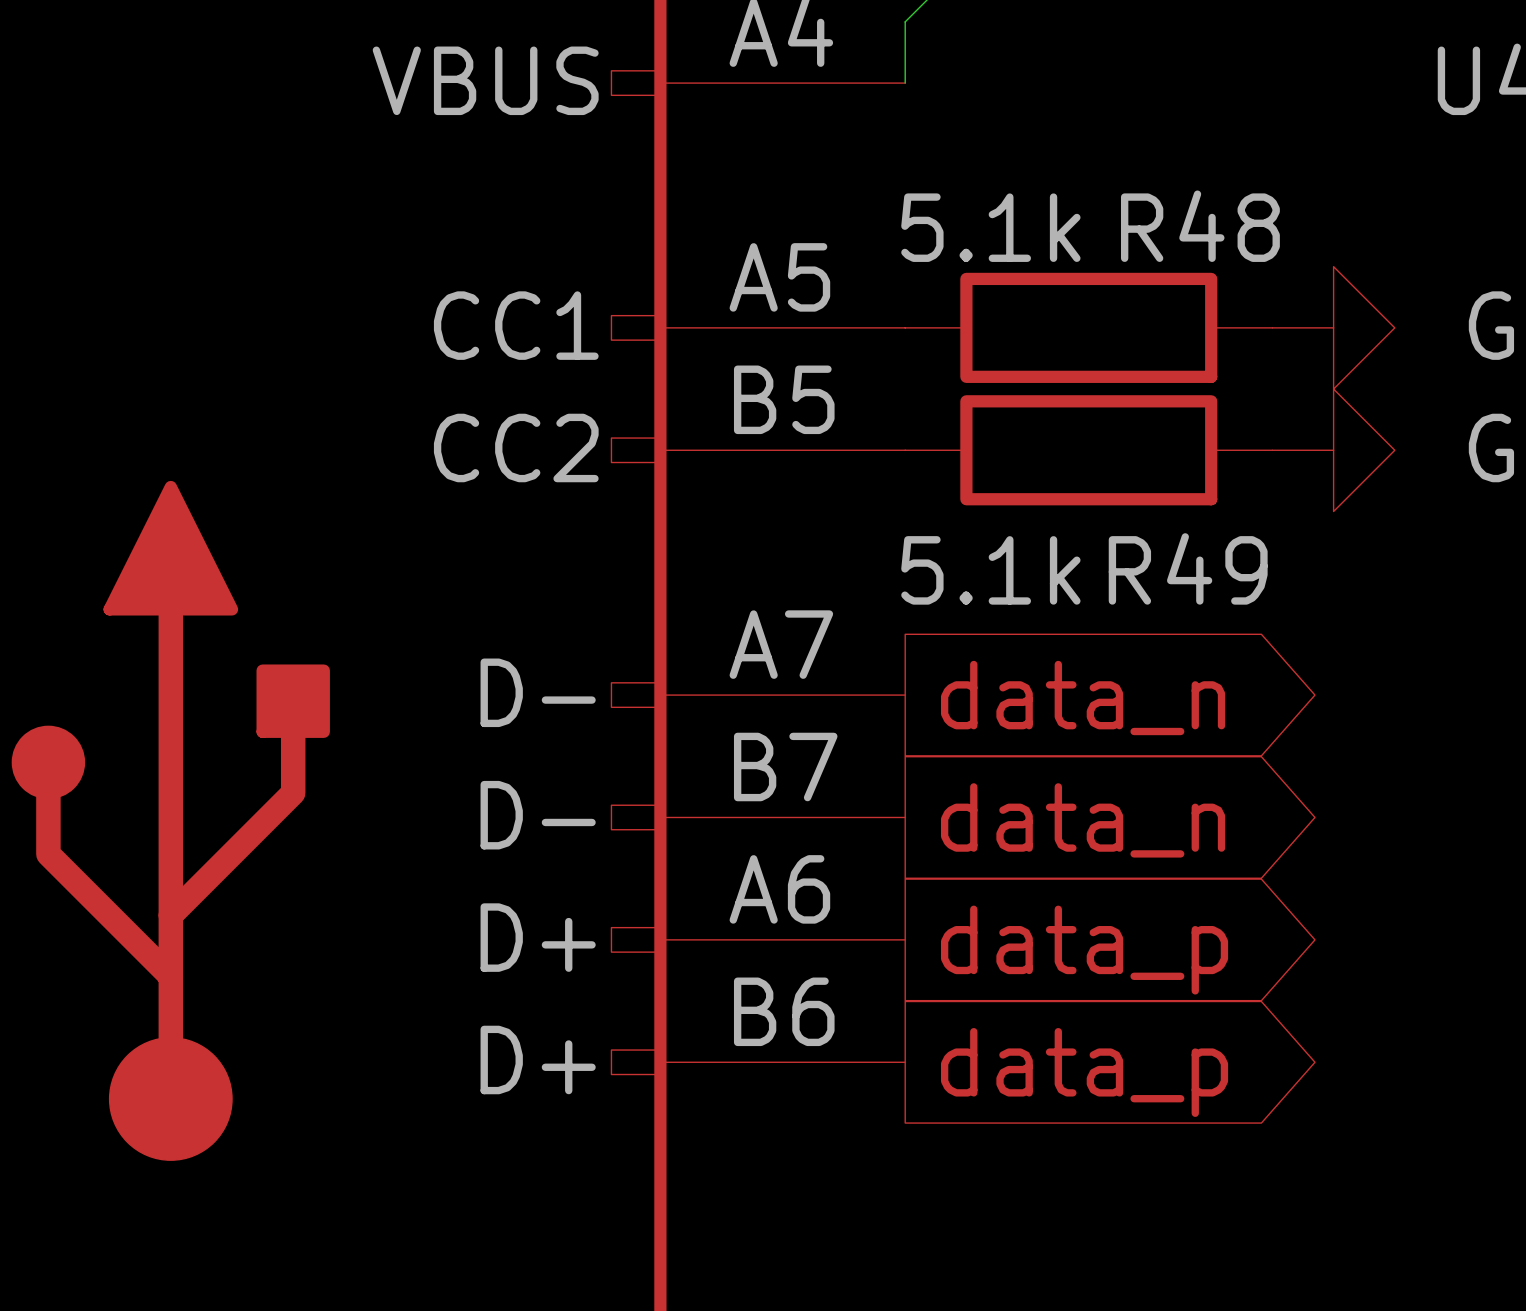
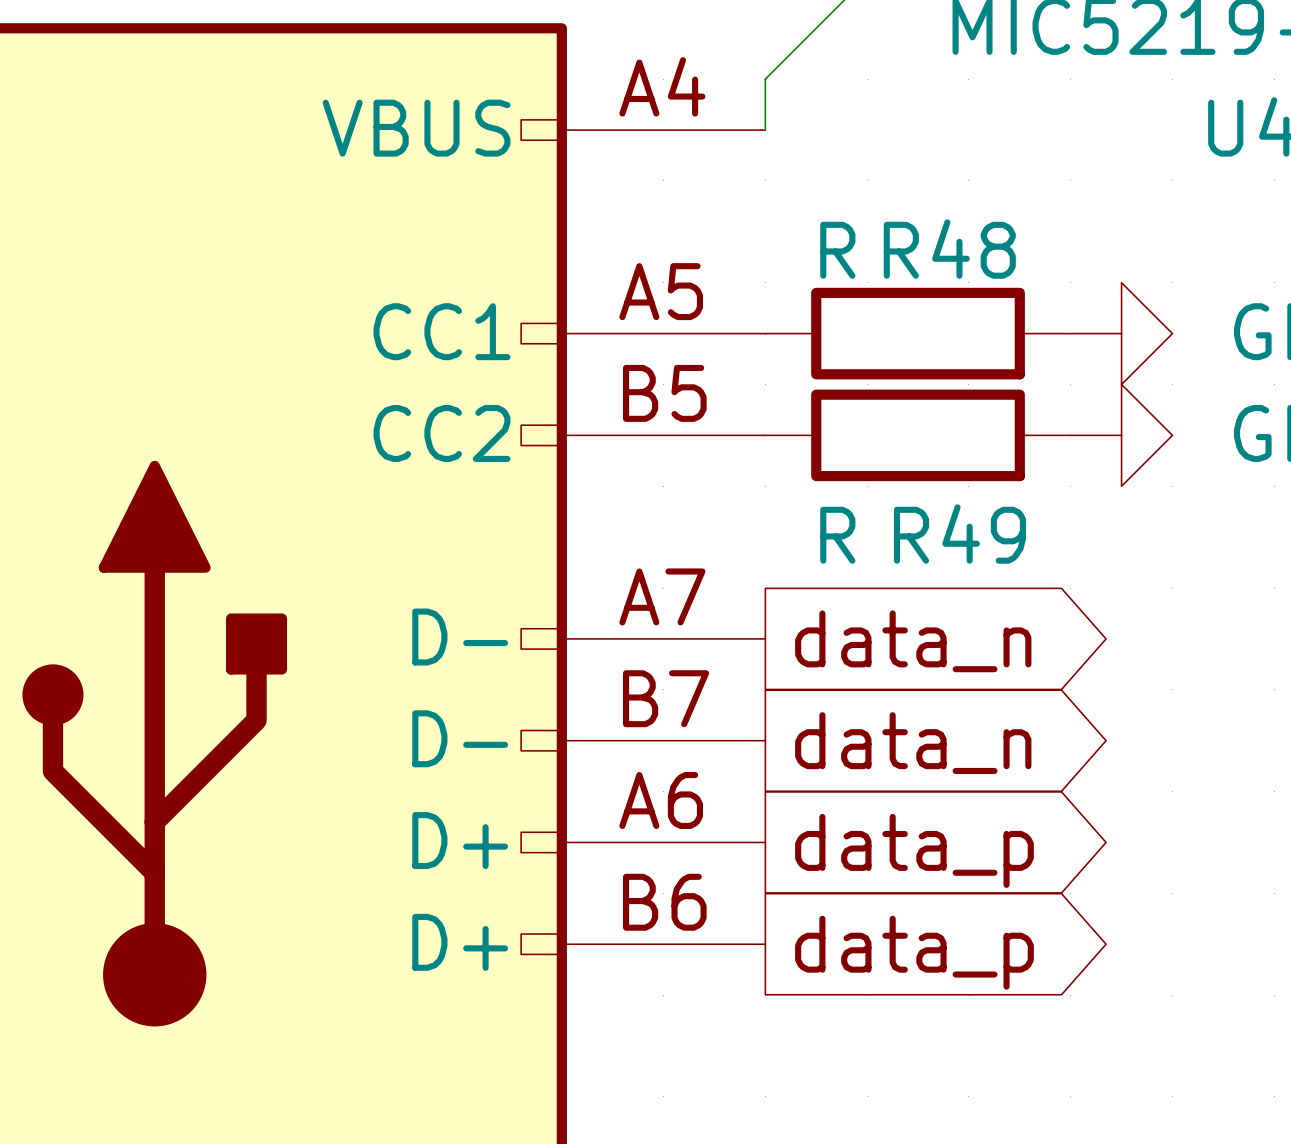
R48 name position: R48 (1200, 226) -> R48 (949, 249)
R48 value: 5.1k (990, 227) -> R (837, 250)
R49 name position: R49 (1188, 568) -> R49 (959, 534)
R49 value: 5.1k (990, 570) -> R (837, 535)

